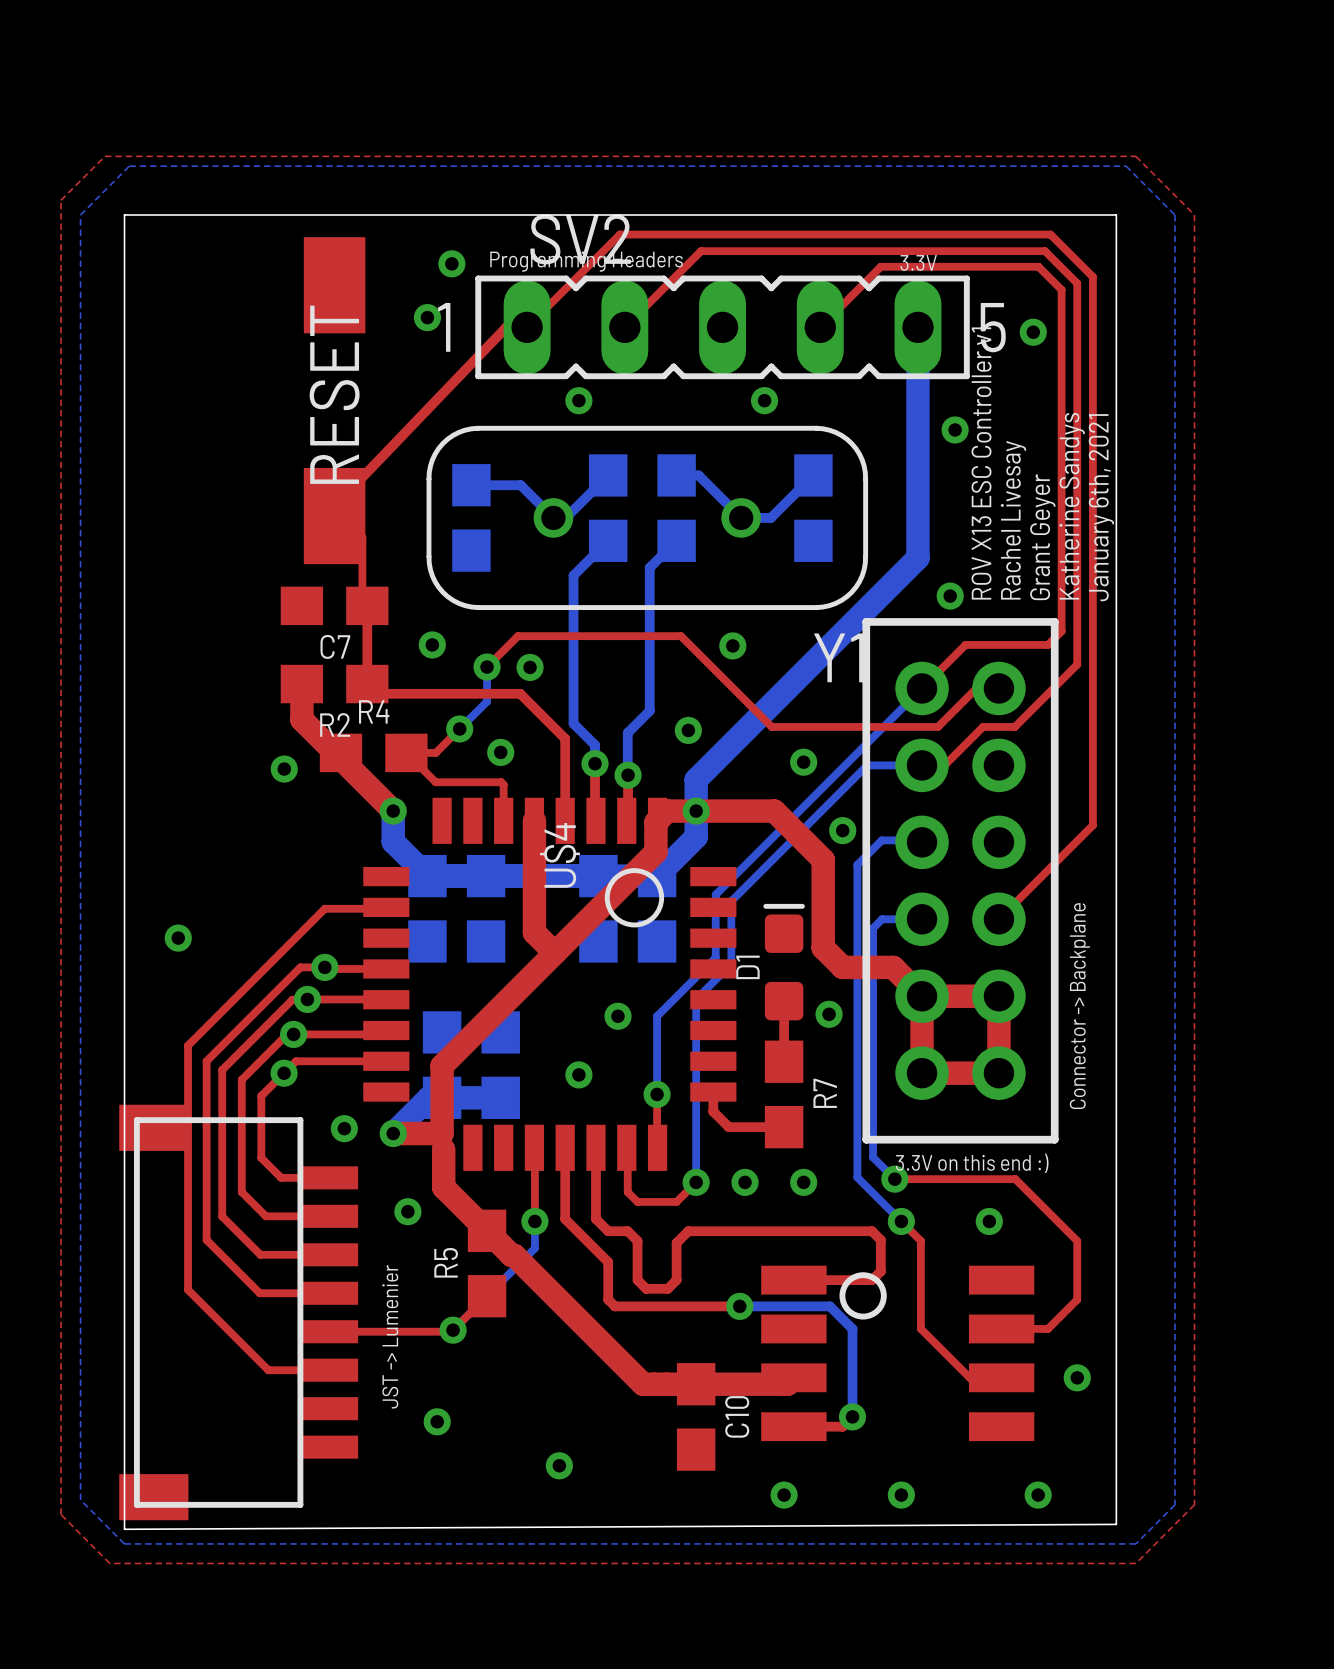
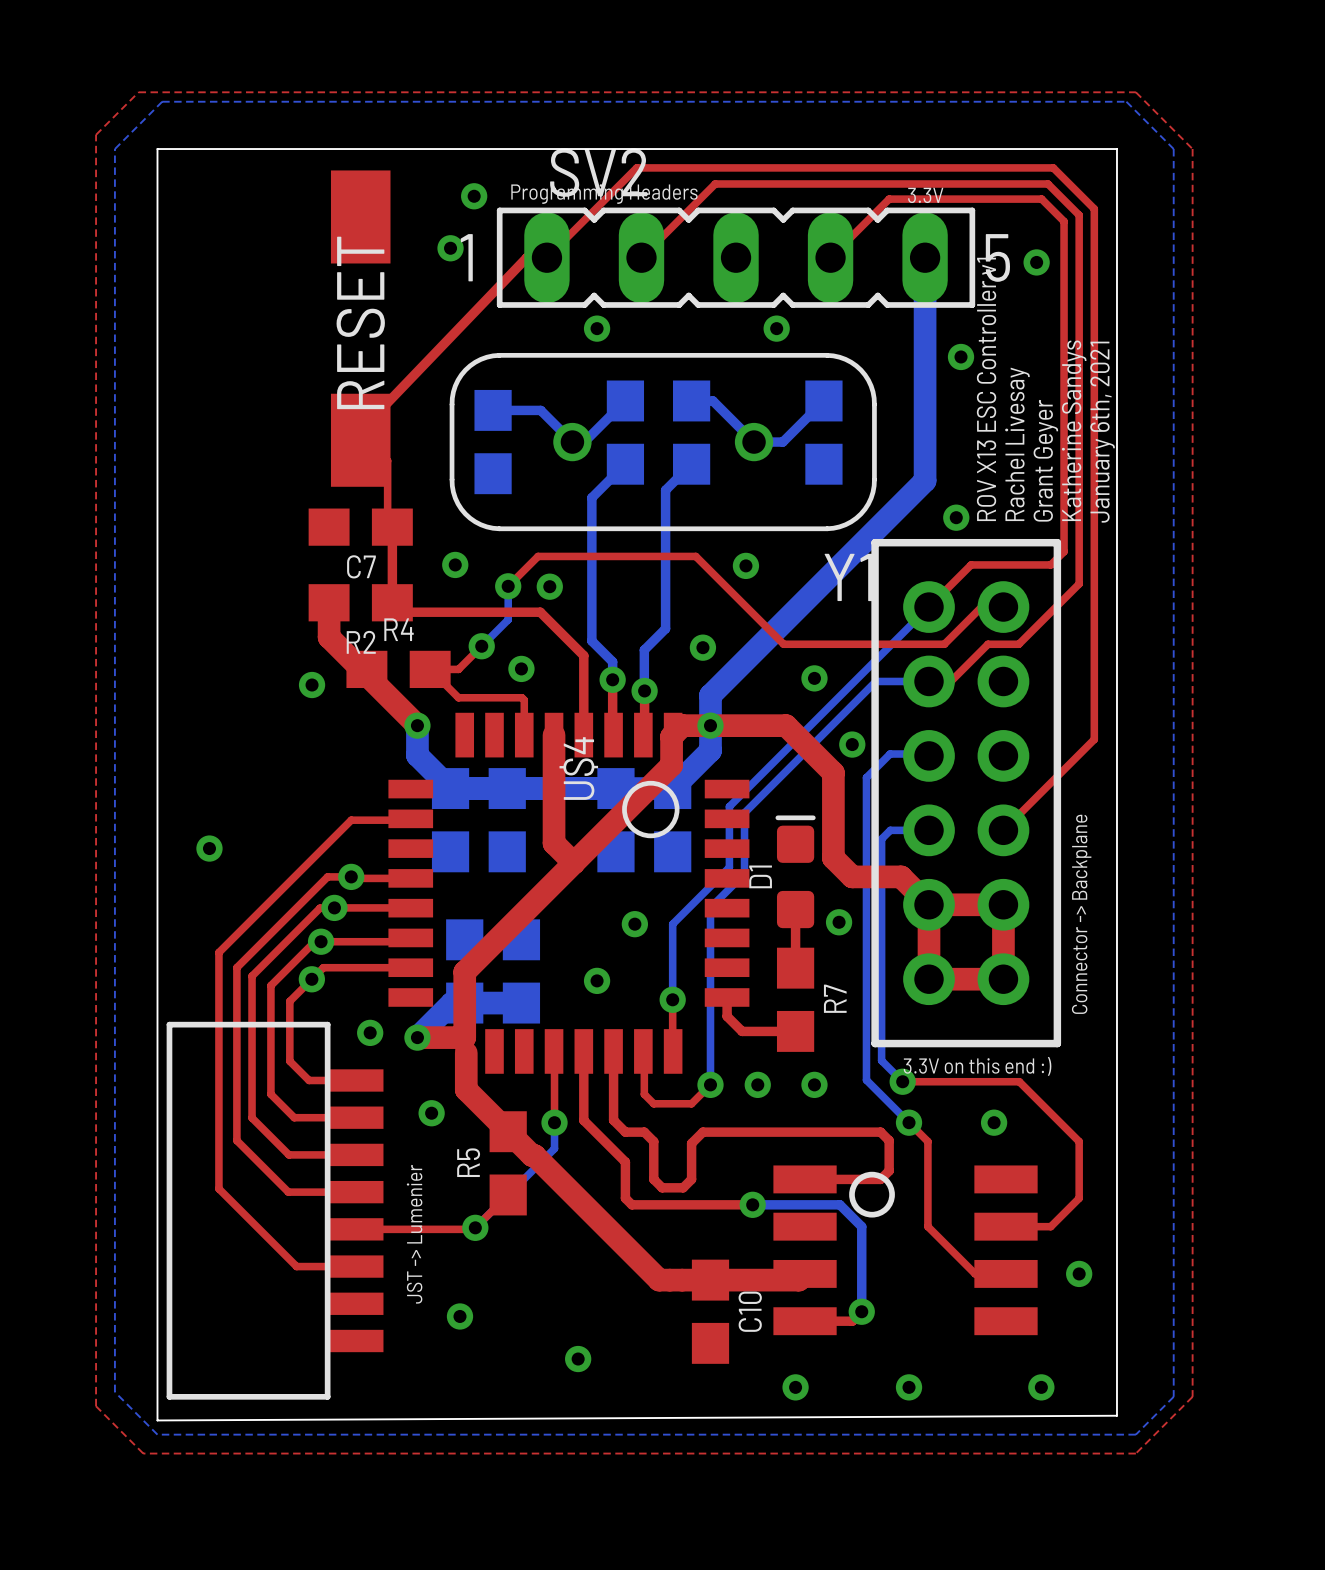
part footprint: [119, 1104, 359, 1521] -> [166, 1021, 384, 1400]

